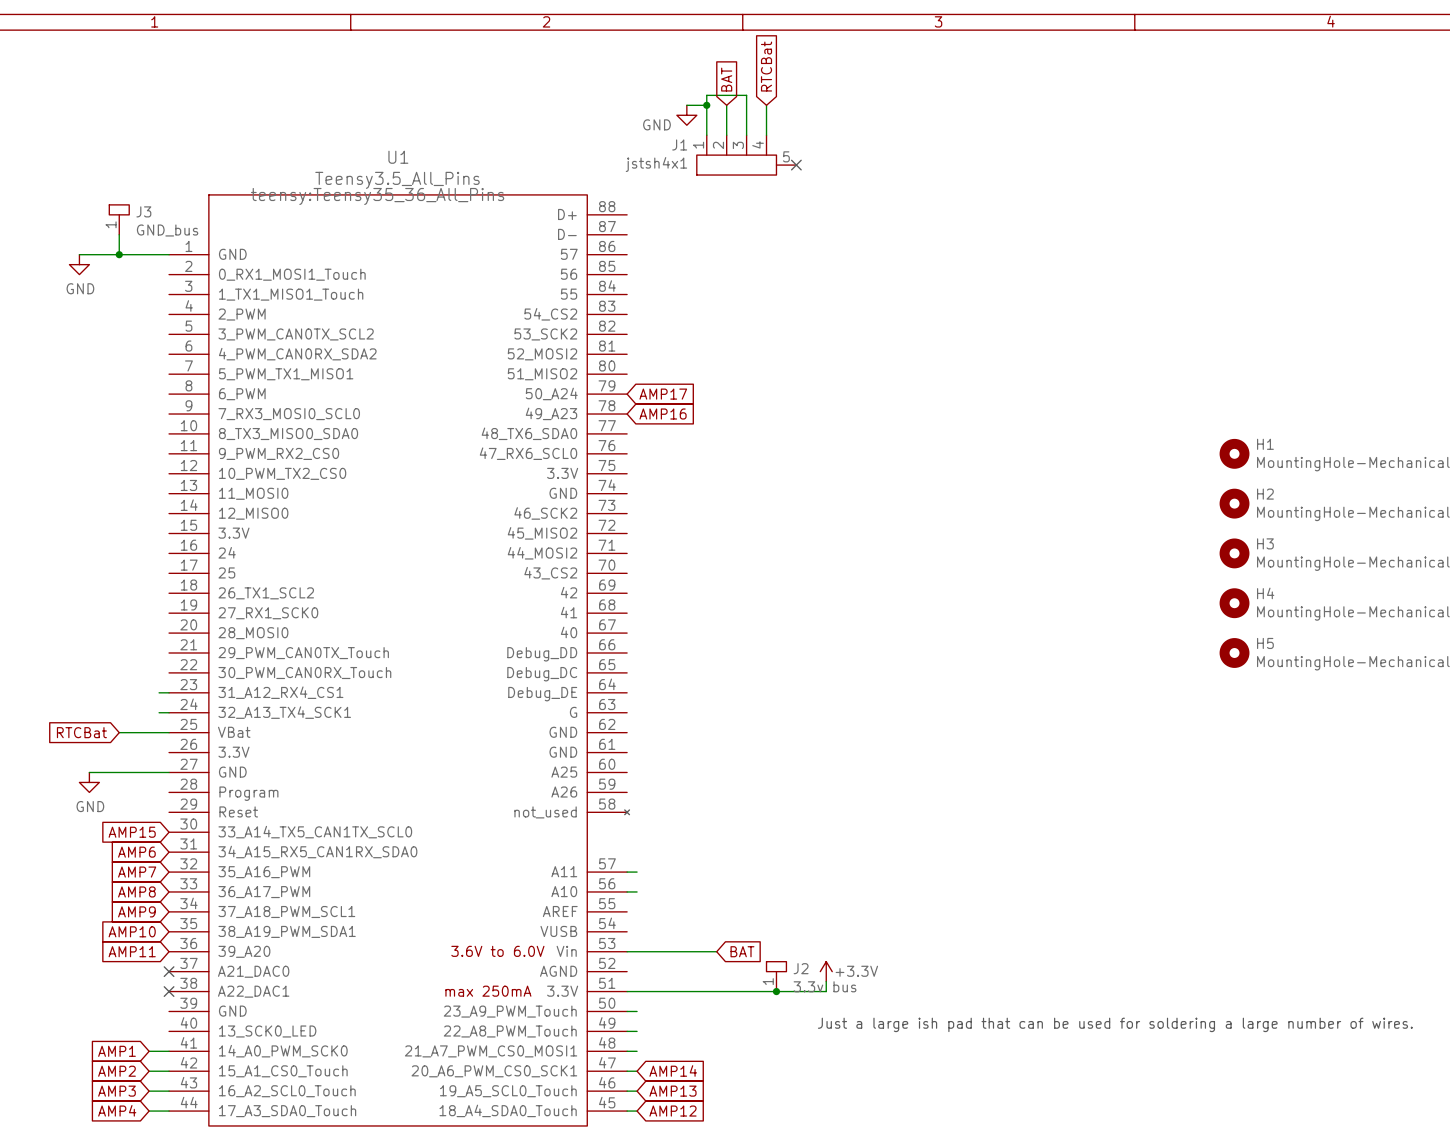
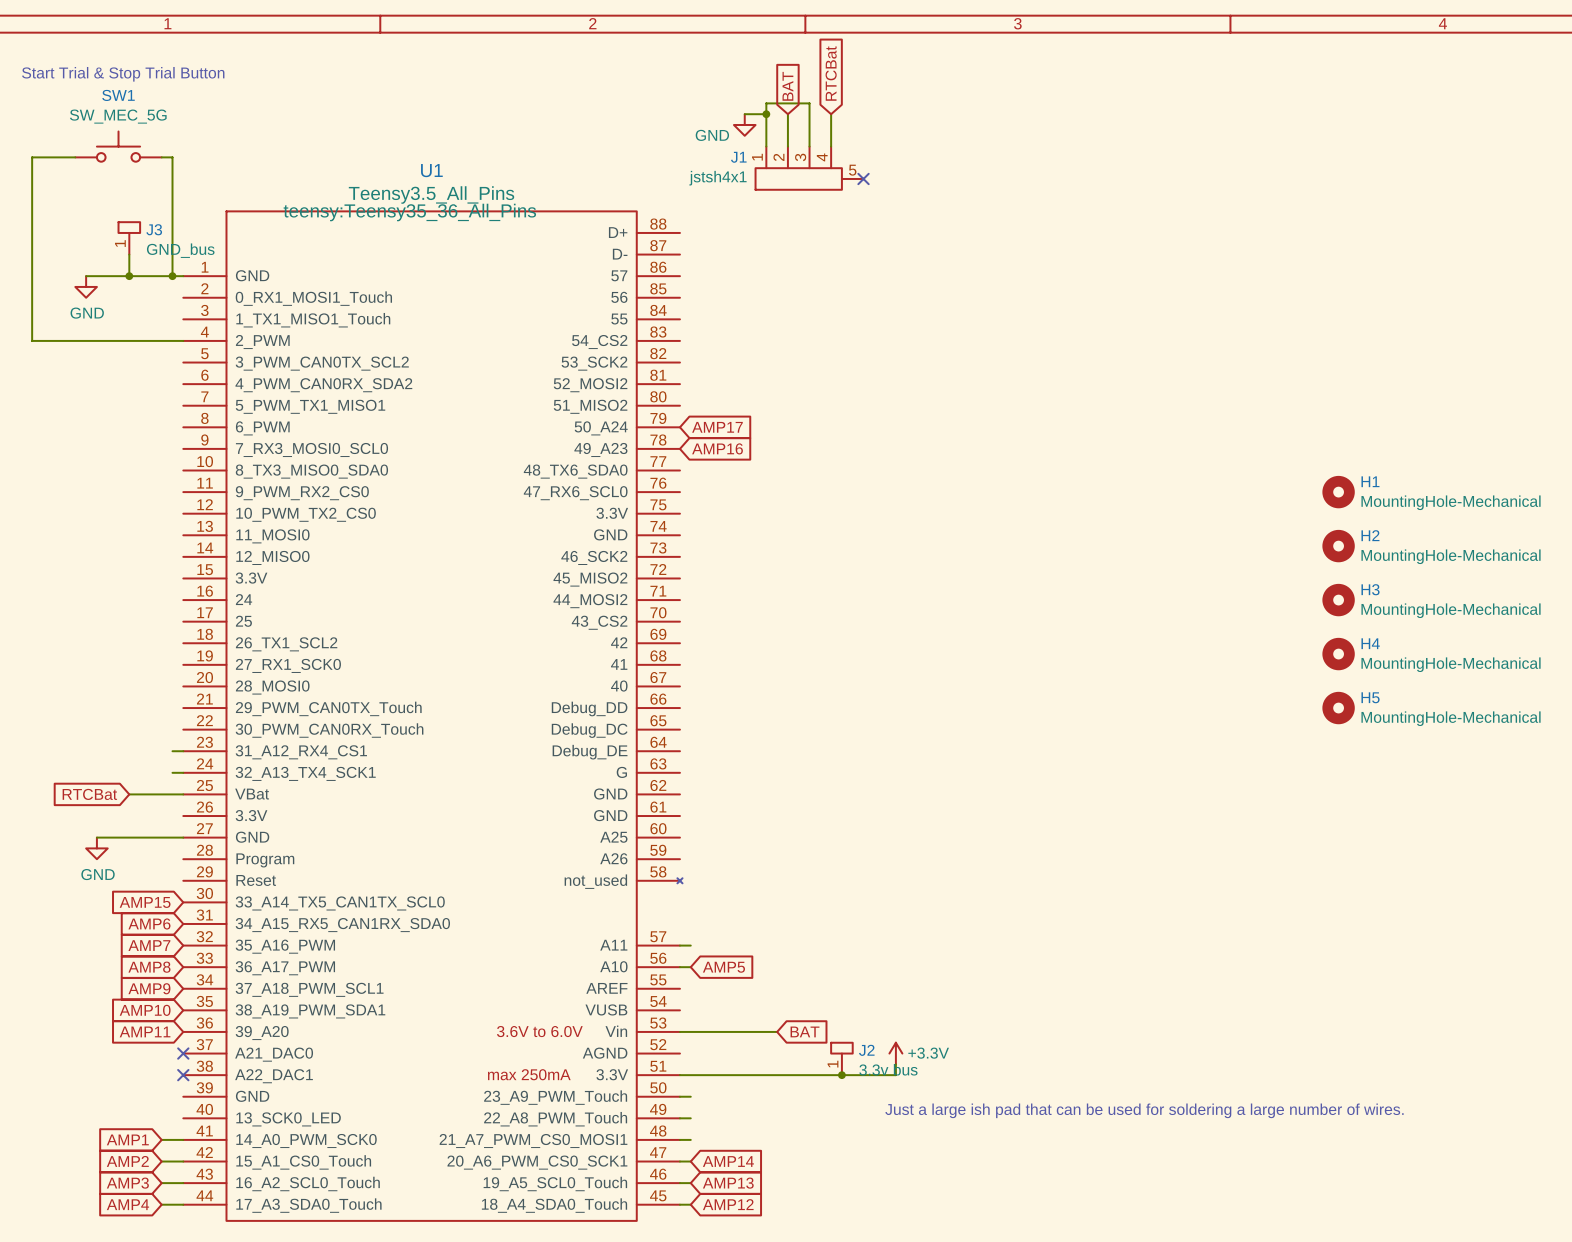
text: none -> Start Trial & Stop Trial Button (123, 74)
SW1: none -> SW_MEC_5G (118, 146)
wire: none -> (75, 157) (32, 157) (32, 340) (183, 340)
wire: none -> (161, 157) (172, 157) (172, 276)
junction: none -> (172, 276)
global label: none -> AMP5 (723, 967)

